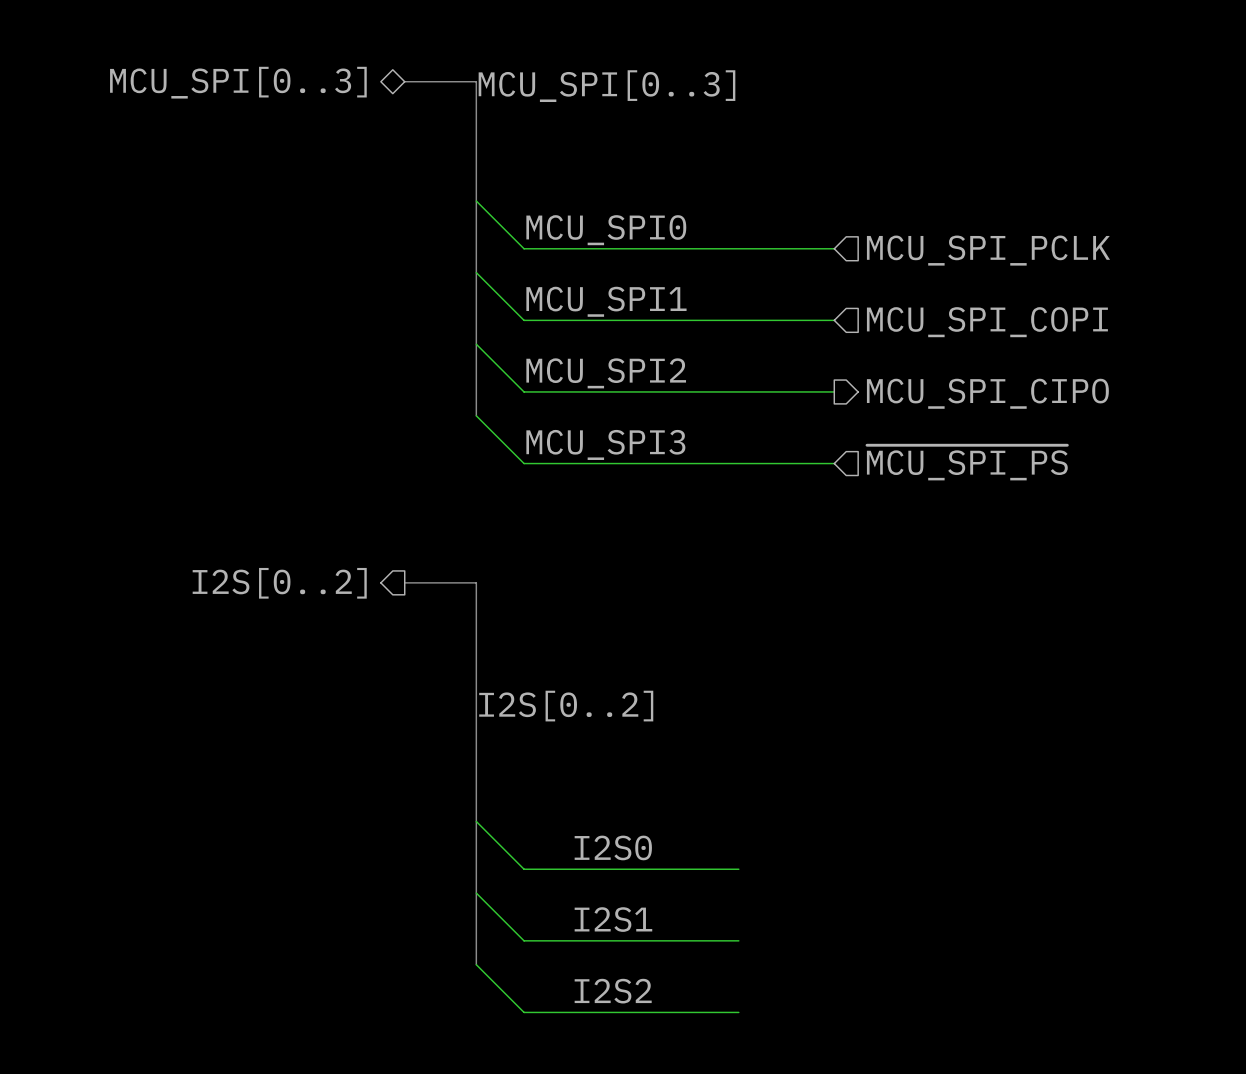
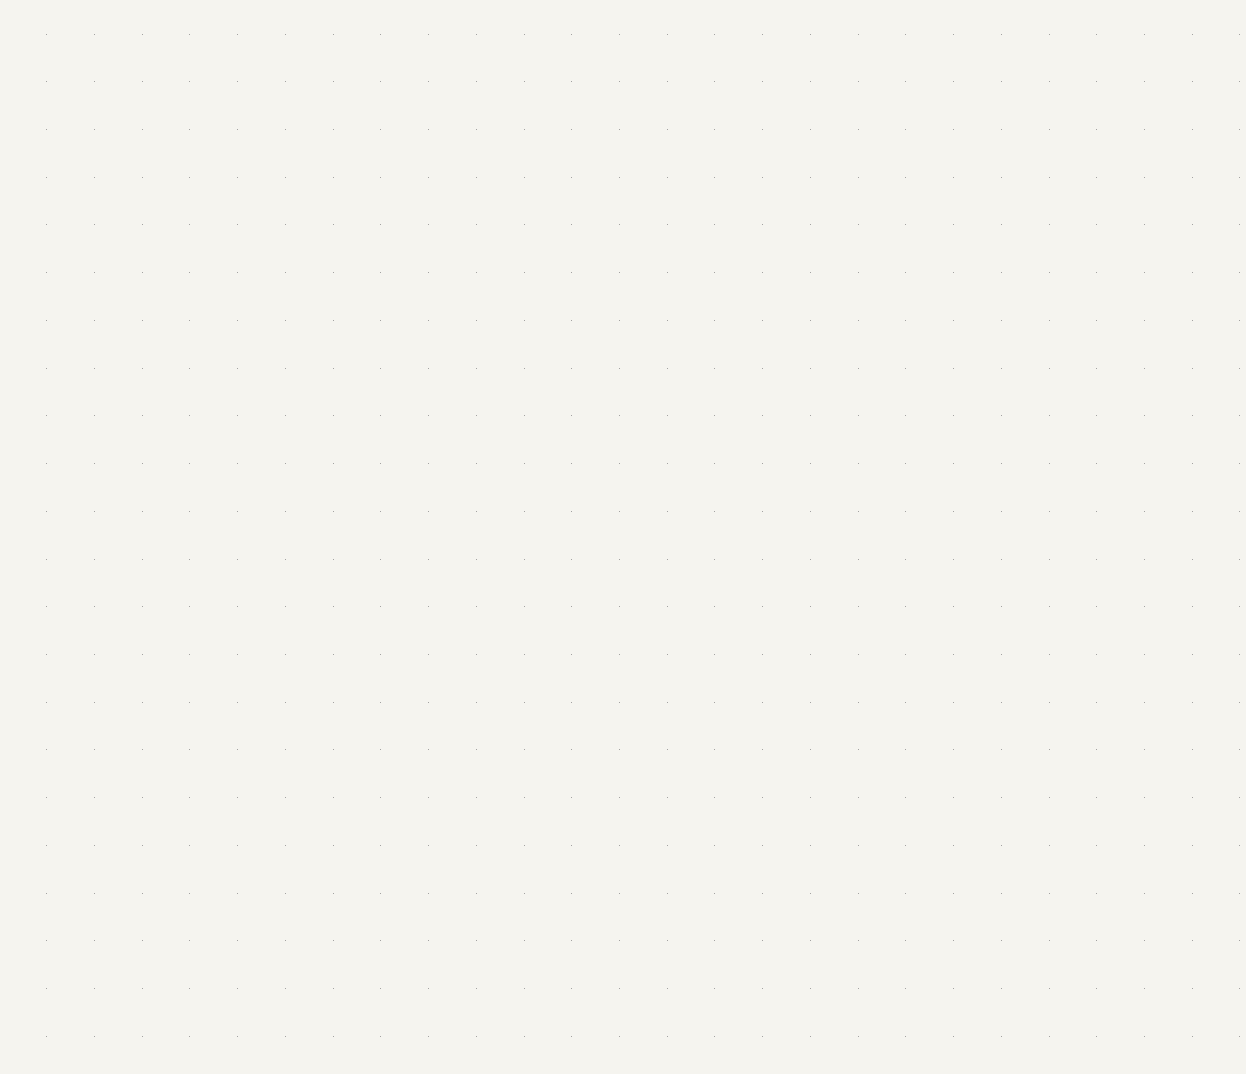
bus: (404, 81) (476, 81) (476, 415) -> none
hierarchical label: MCU_SPI[0..3] (238, 82) -> none
label: MCU_SPI[0..3] (606, 86) -> none
wire: (476, 201) (524, 248) (834, 248) -> none
label: MCU_SPI0 (606, 230) -> none
hierarchical label: MCU_SPI_PCLK (988, 250) -> none
wire: (476, 272) (524, 320) (834, 320) -> none
label: MCU_SPI1 (606, 301) -> none
hierarchical label: MCU_SPI_COPI (987, 322) -> none
wire: (476, 344) (524, 391) (834, 391) -> none
label: MCU_SPI2 (606, 373) -> none
hierarchical label: MCU_SPI_CIPO (987, 393) -> none
wire: (476, 415) (524, 463) (834, 463) -> none
label: MCU_SPI3 (605, 444) -> none
hierarchical label: ~{MCU_SPI_PS} (967, 462) -> none
bus: (404, 582) (476, 582) (476, 964) -> none
hierarchical label: I2S[0..2] (279, 583) -> none
label: I2S[0..2] (566, 706) -> none
wire: (476, 821) (524, 869) (738, 869) -> none
label: I2S0 (613, 847) -> none
wire: (476, 893) (524, 940) (738, 940) -> none
label: I2S1 (613, 919) -> none
wire: (476, 964) (524, 1012) (738, 1012) -> none
label: I2S2 (613, 991) -> none

